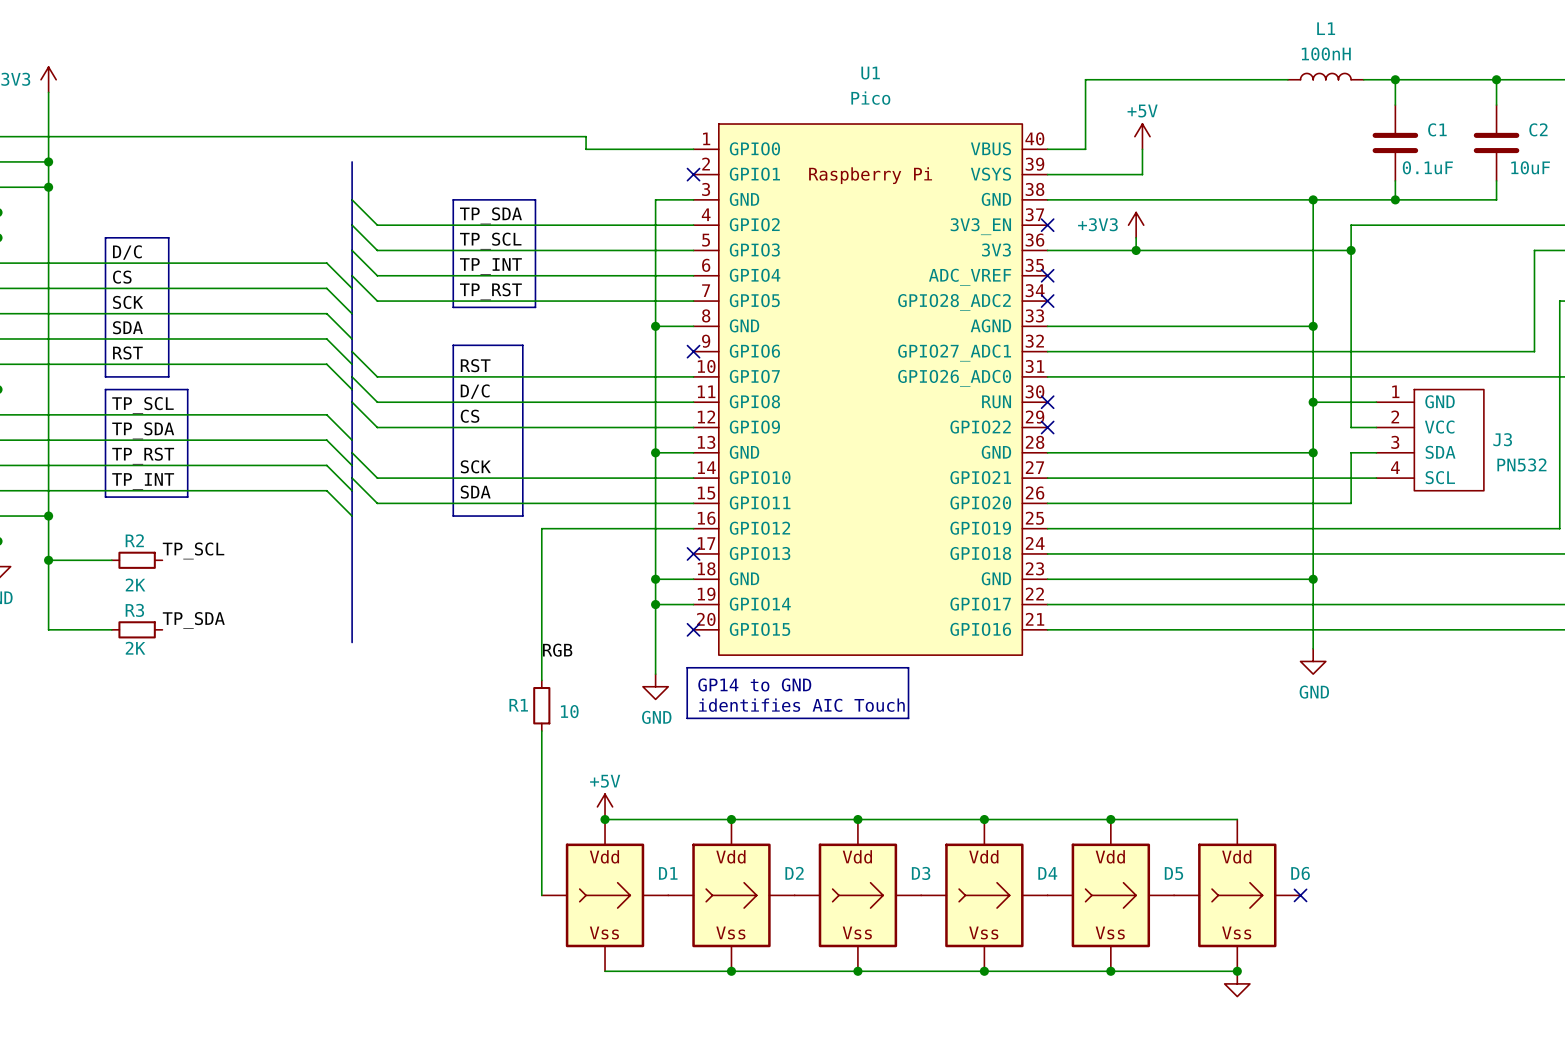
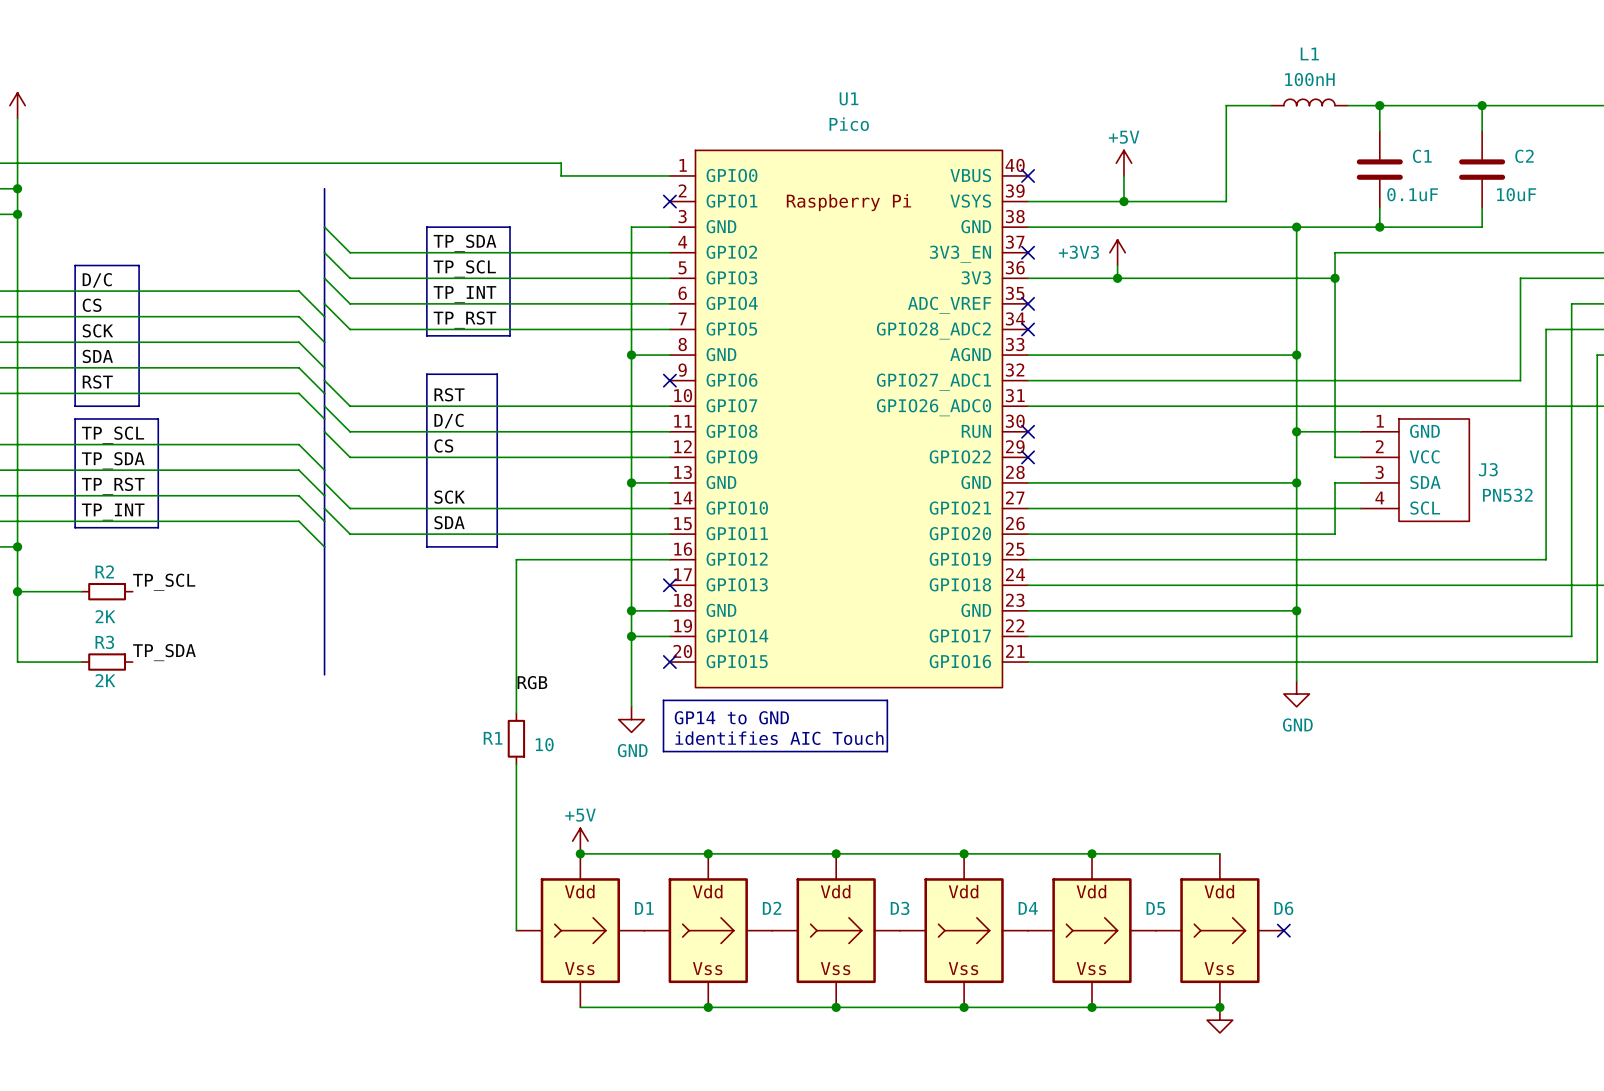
wire: (1243, 79) (1085, 79) (1085, 149) (1047, 149) -> (1226, 105) (1226, 201) (1123, 201)
no-connect mark: none -> (1028, 175)
junction: none -> (1123, 201)

